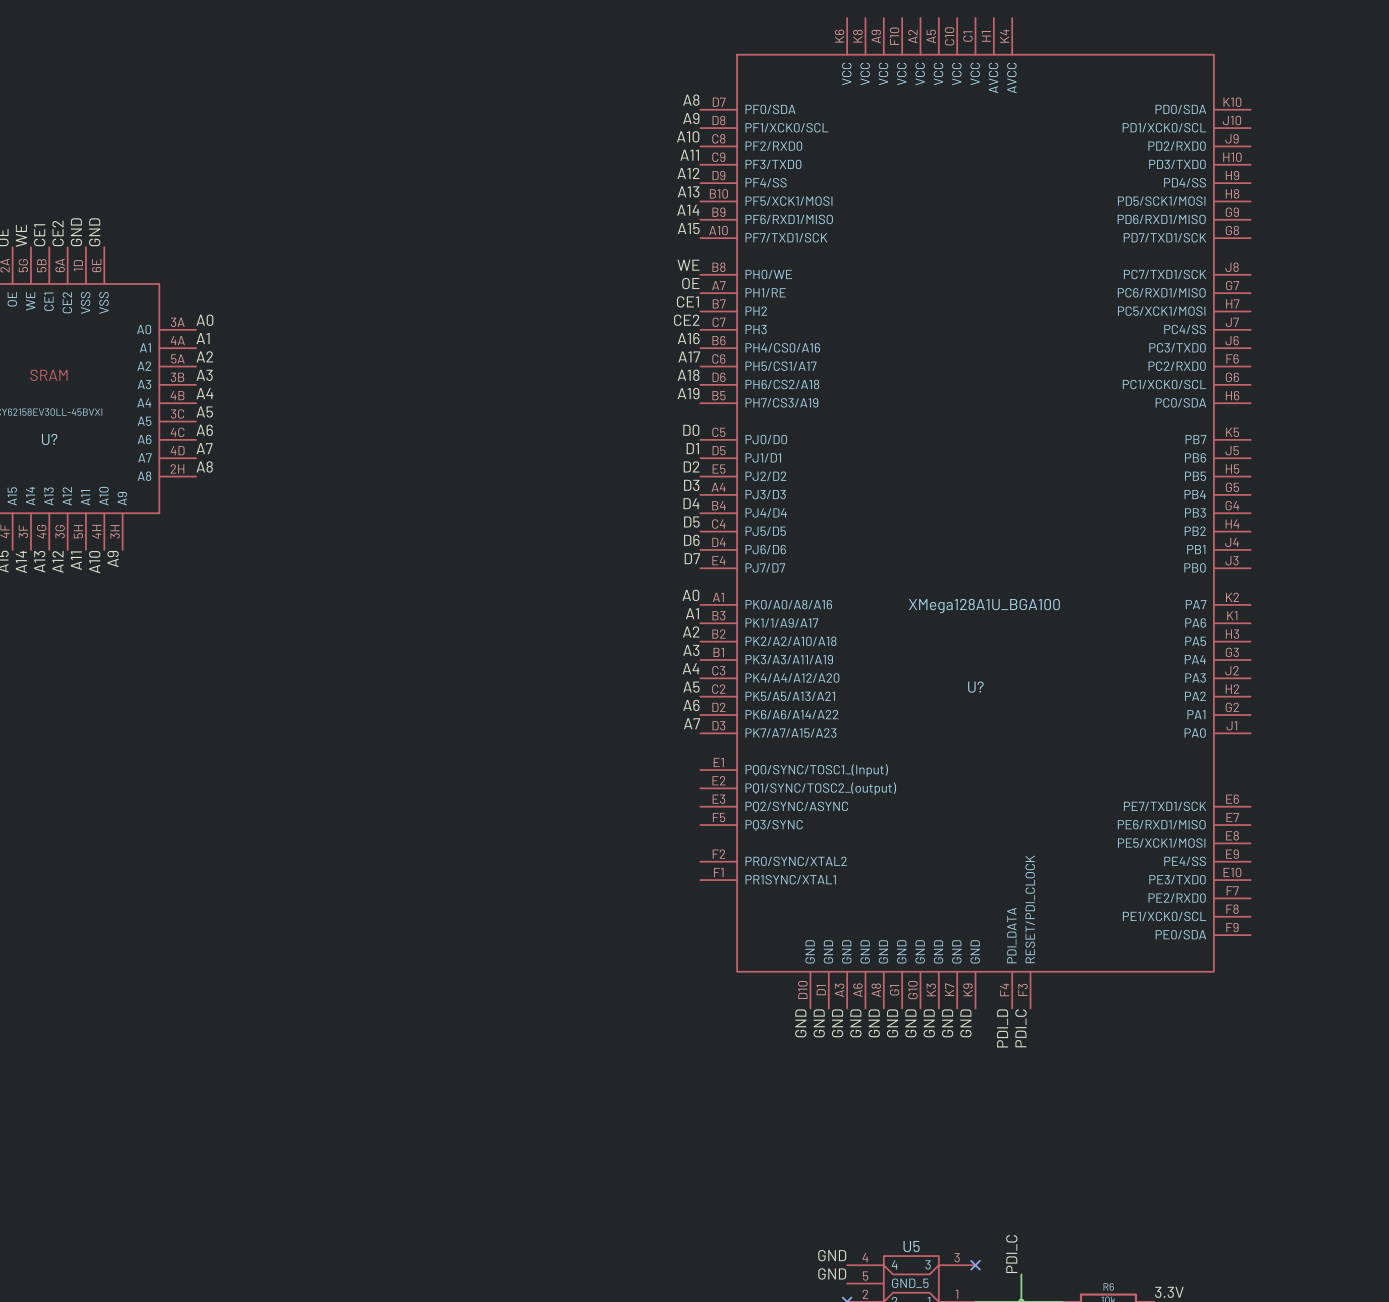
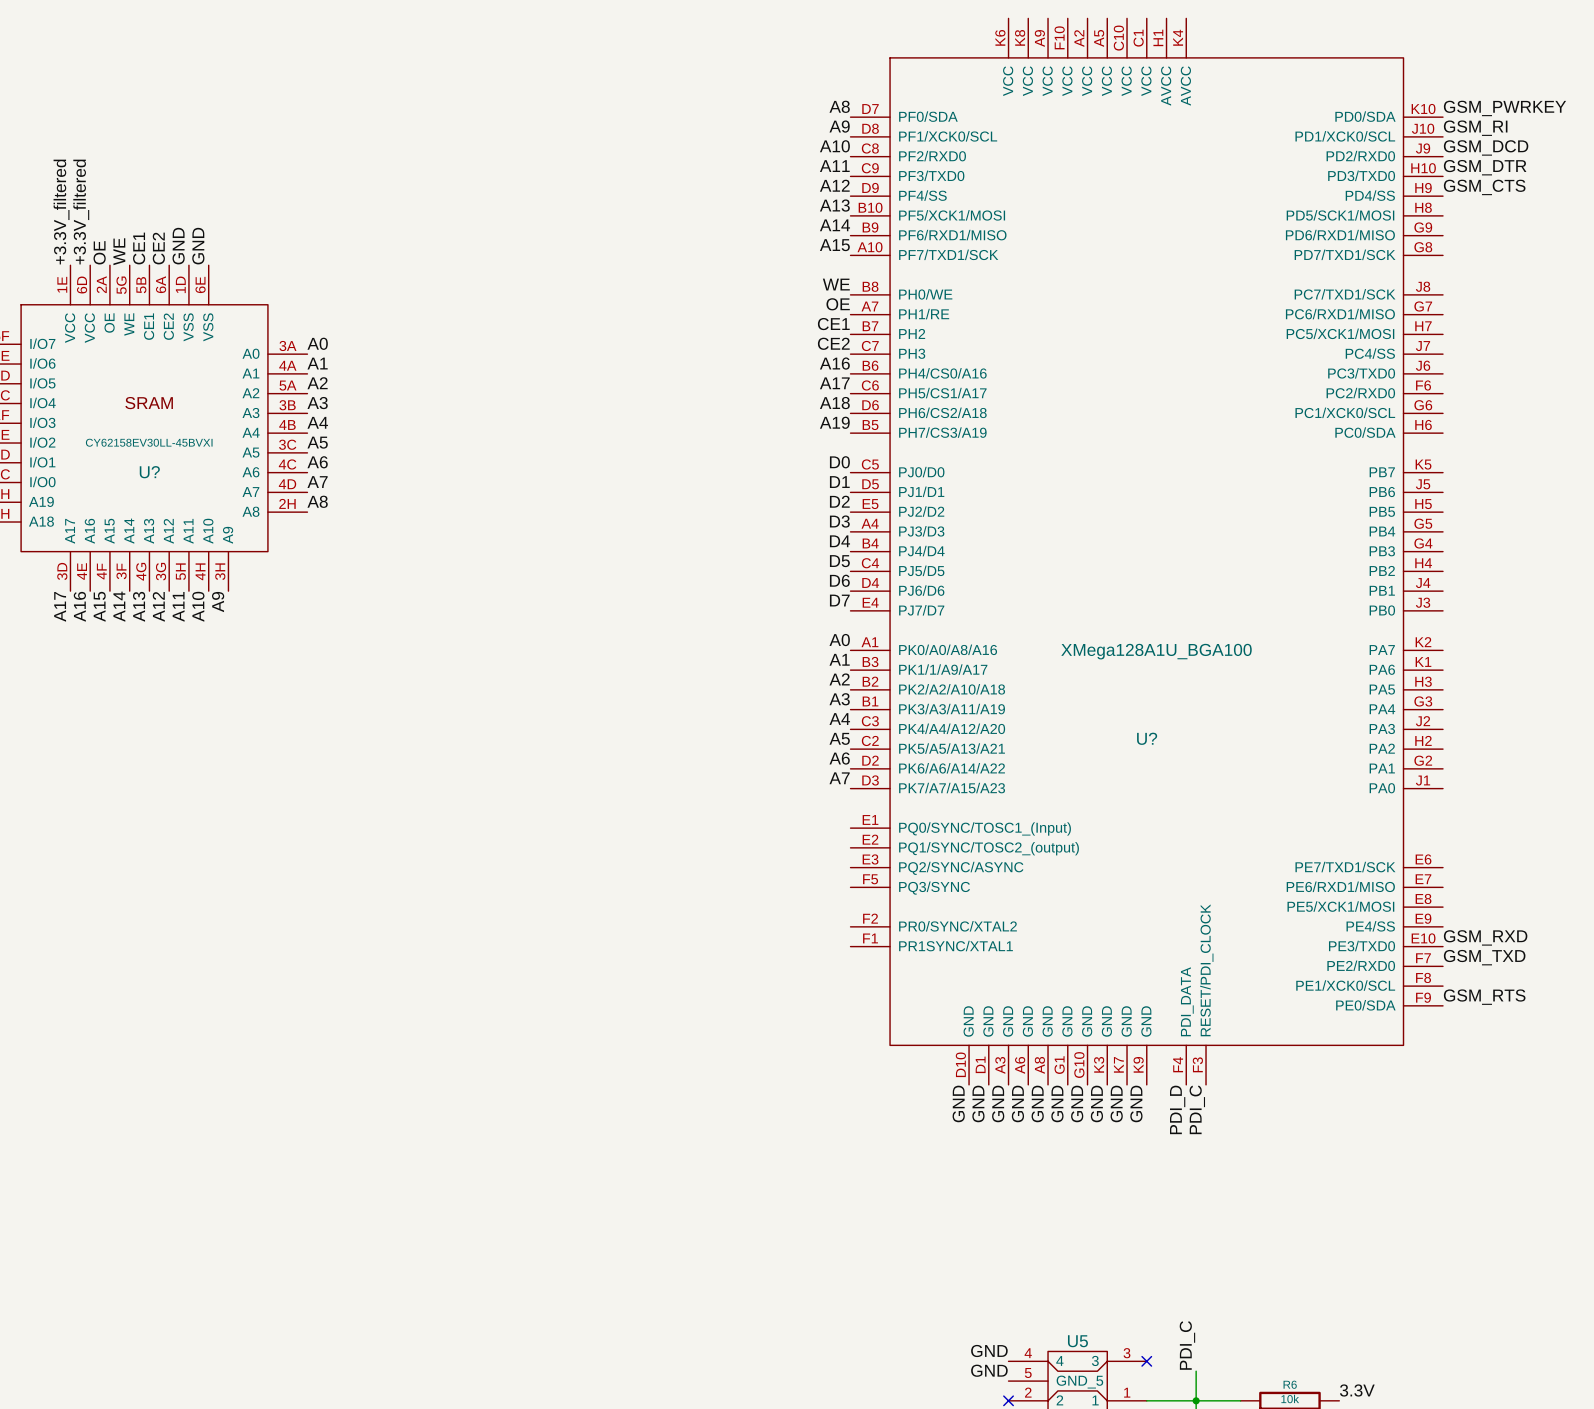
label: none -> GSM_PWRKEY (1504, 108)
label: none -> GSM_RI (1475, 128)
label: none -> GSM_DCD (1486, 147)
label: none -> GSM_DTR (1485, 167)
label: none -> GSM_CTS (1484, 187)
label: none -> GSM_RXD (1485, 937)
label: none -> GSM_TXD (1484, 957)
label: none -> GSM_RTS (1484, 997)

